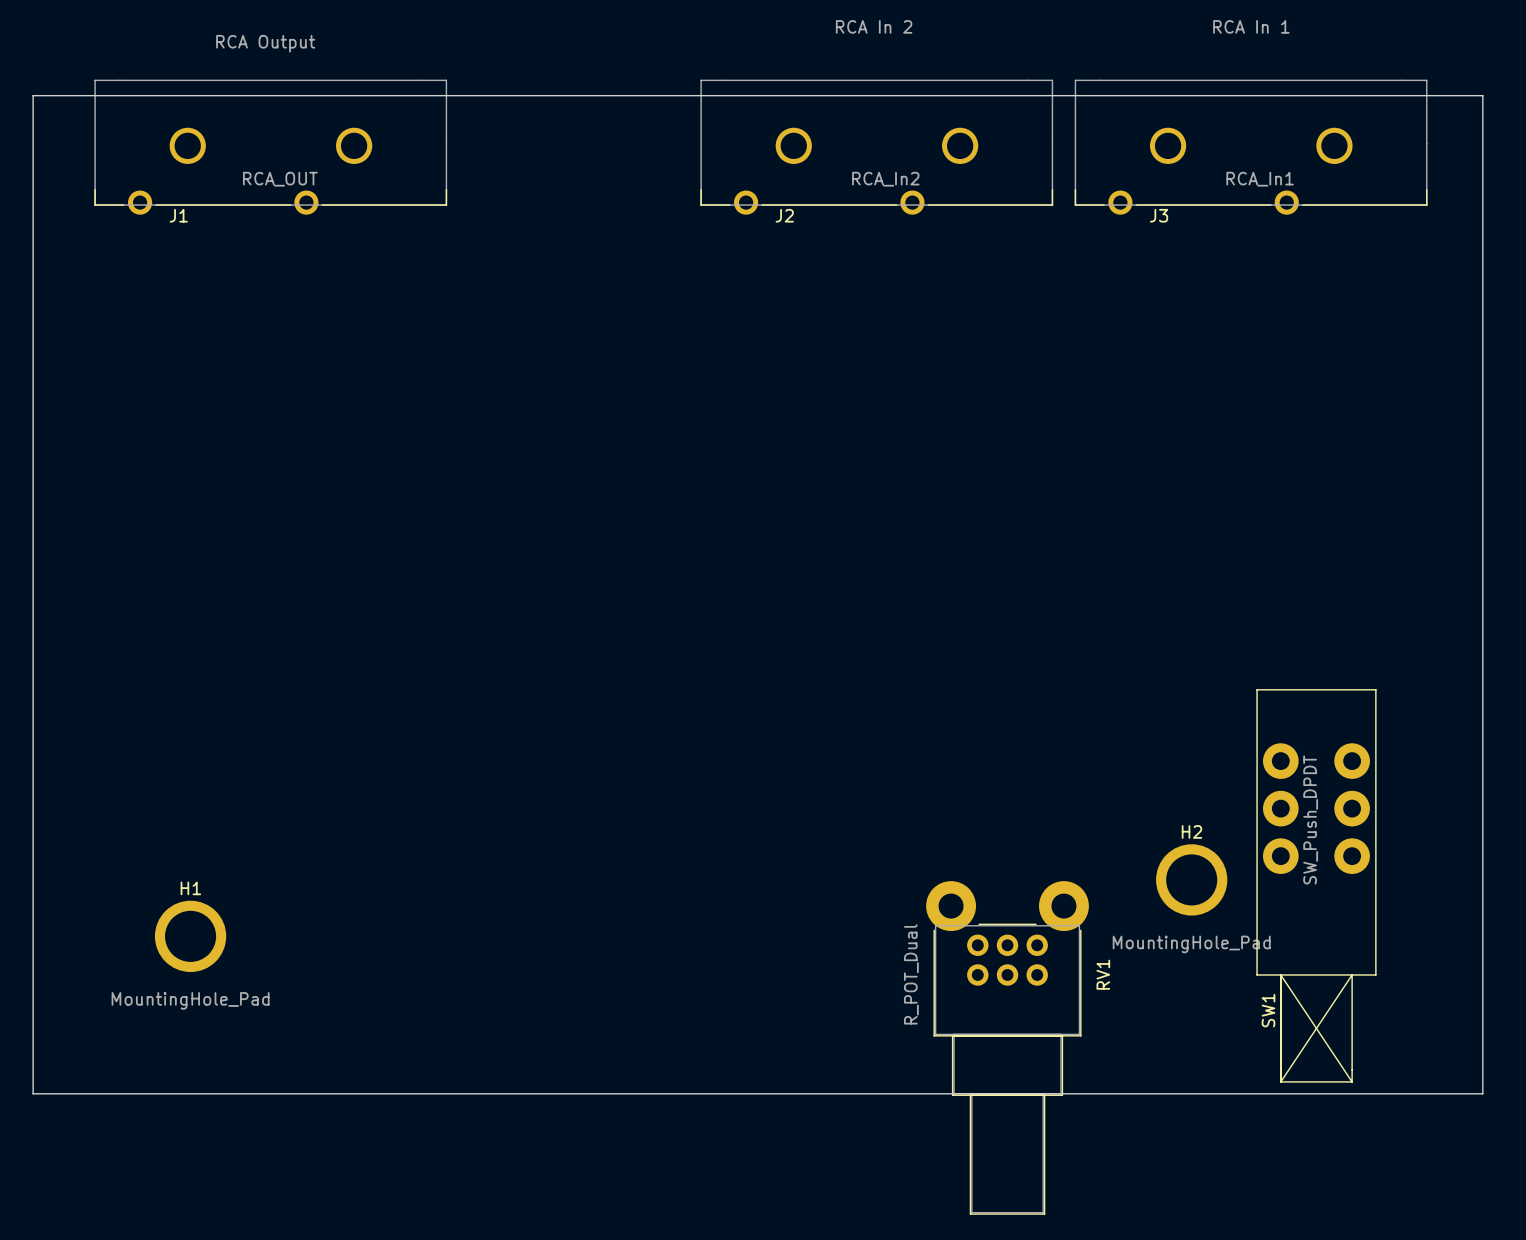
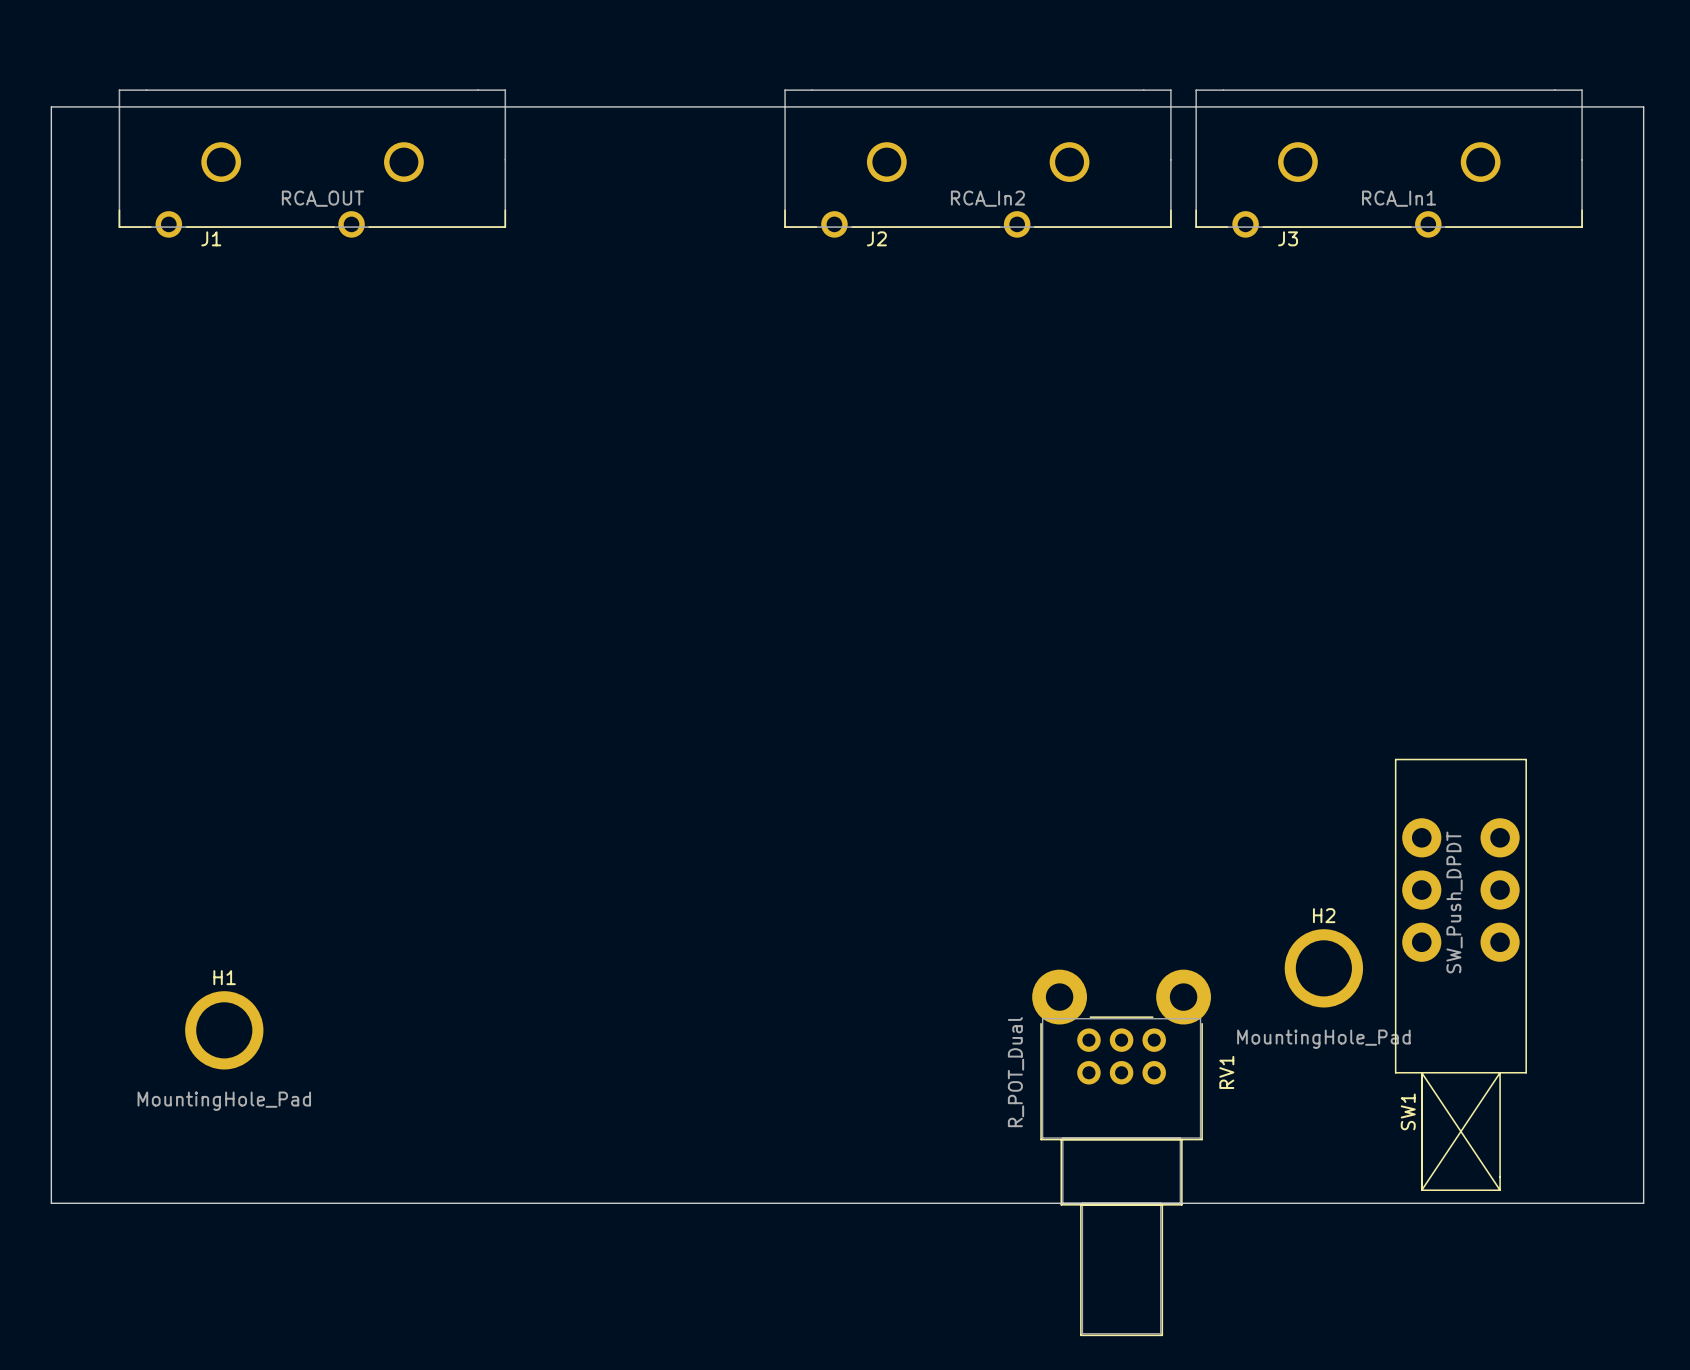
text: RCA In 2 (874, 26) -> none
text: RCA In 1 (1251, 26) -> none
text: RCA Output (265, 43) -> none

